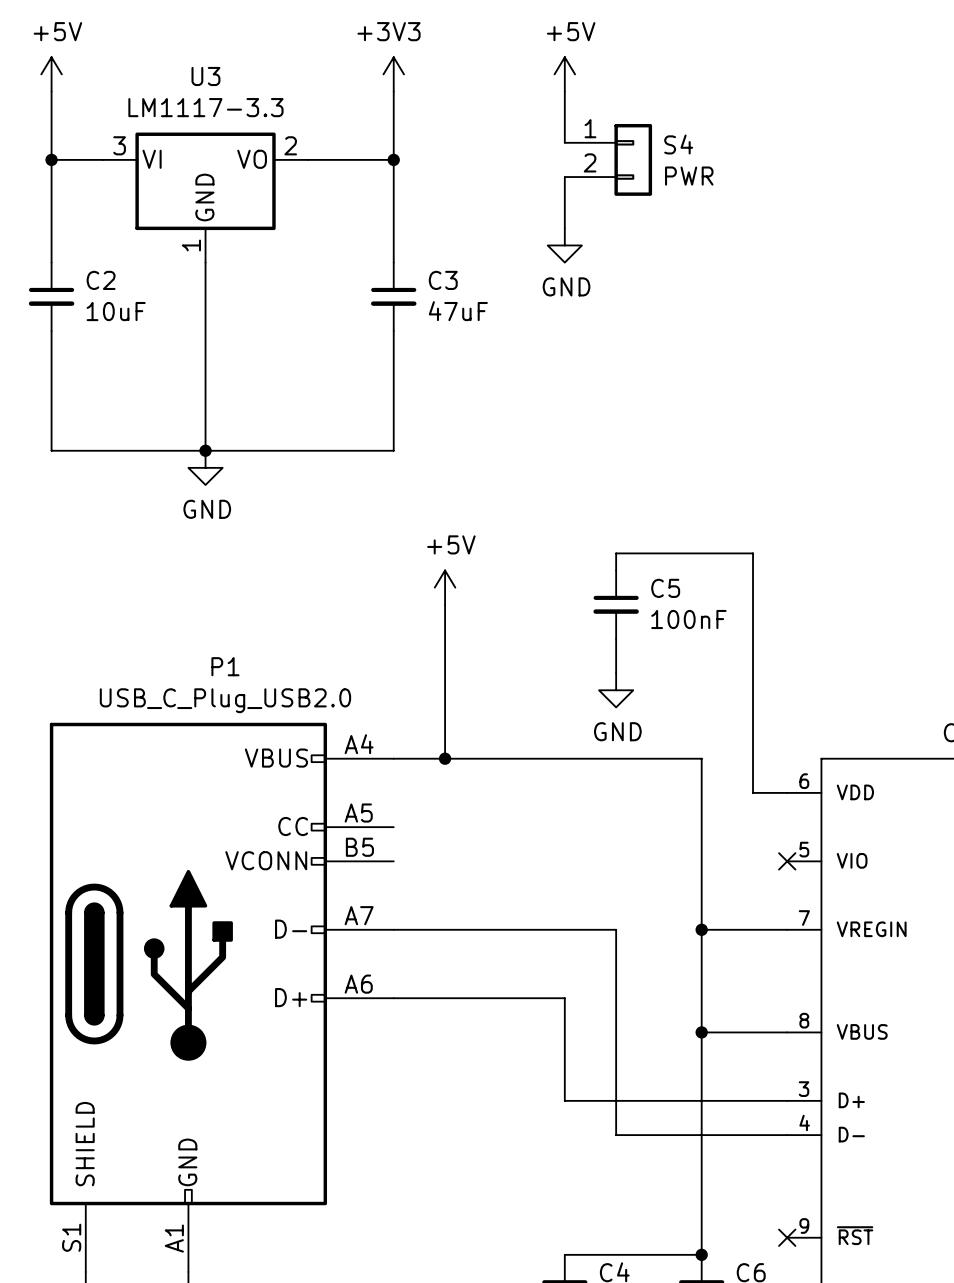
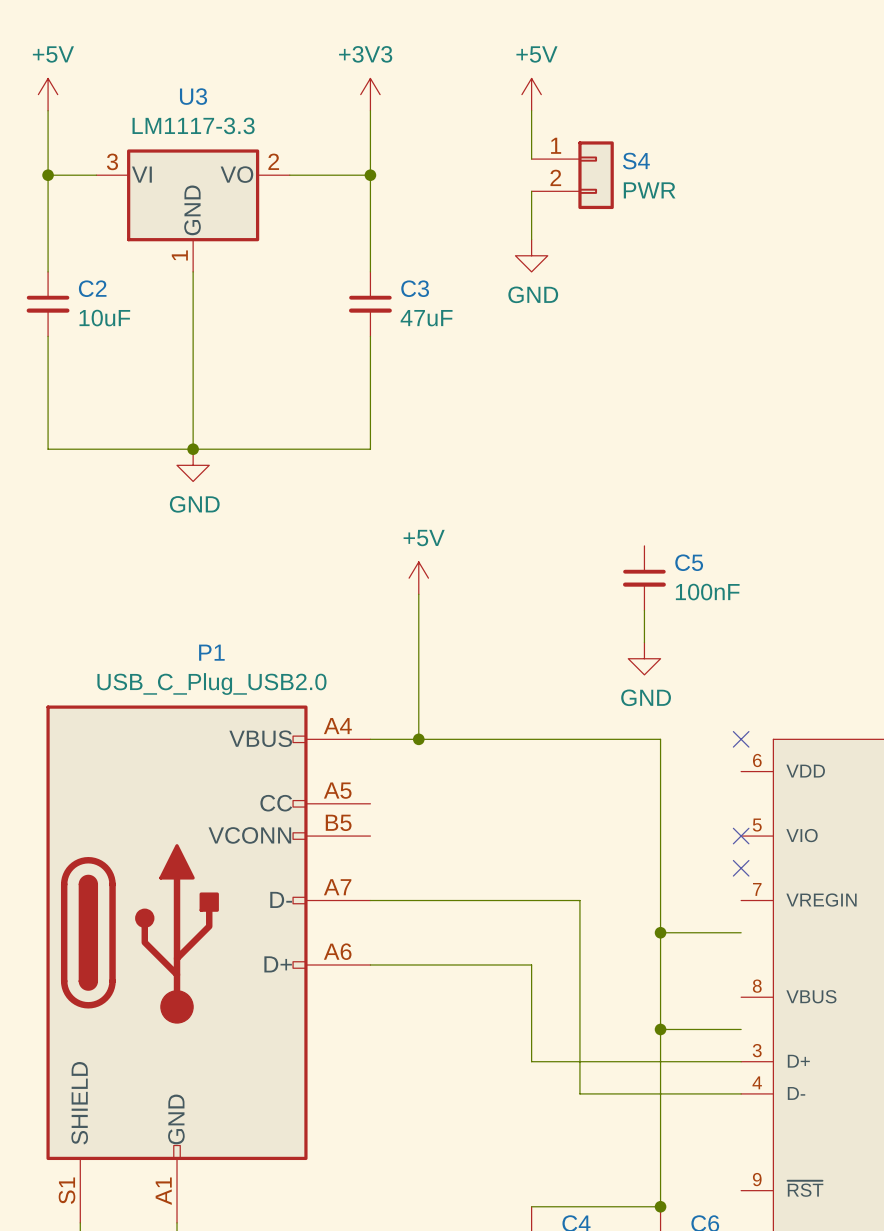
wire: (616, 570) (616, 553) (753, 553) (753, 792) (787, 792) -> none
C5 position: (616, 604) -> (644, 578)
wire: (616, 638) (616, 673) -> (644, 610) (644, 642)
power symbol position: GND (616, 690) -> GND (644, 658)
no-connect mark: none -> (741, 739)
no-connect mark: none -> (741, 868)
wire: (701, 929) (787, 929) -> (660, 932) (741, 932)
junction: (701, 929) -> none
junction: none -> (660, 932)
wire: (701, 1032) (787, 1032) -> (660, 1029) (741, 1029)
junction: (701, 1032) -> none
junction: none -> (660, 1029)
no-connect mark: (787, 1237) -> none

